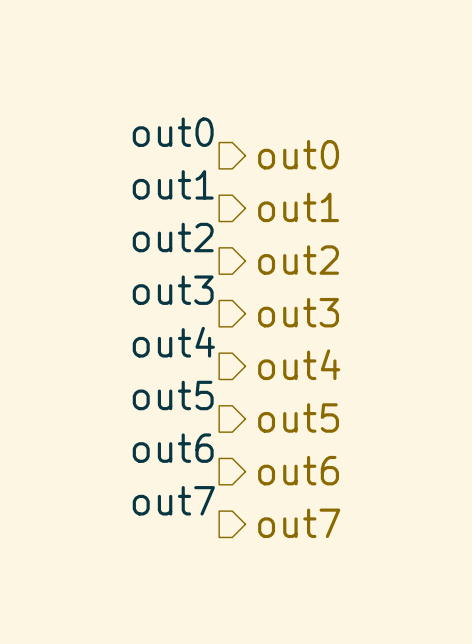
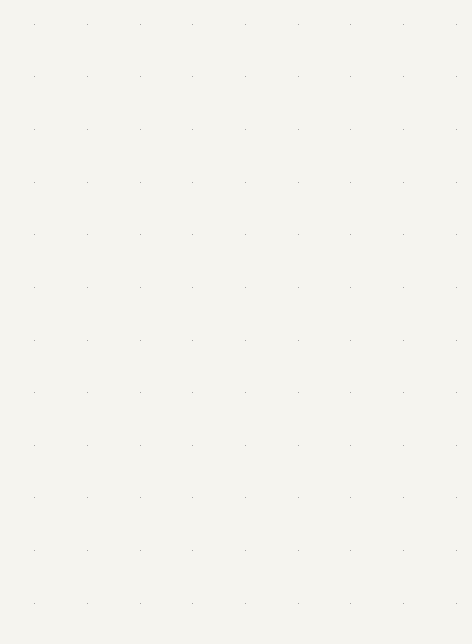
label: out0 (173, 132) -> none
hierarchical label: out0 (298, 154) -> none
label: out1 (173, 184) -> none
hierarchical label: out1 (298, 207) -> none
label: out2 (173, 237) -> none
hierarchical label: out2 (298, 260) -> none
label: out3 (173, 290) -> none
hierarchical label: out3 (298, 312) -> none
label: out4 (173, 342) -> none
hierarchical label: out4 (299, 364) -> none
label: out5 (173, 395) -> none
hierarchical label: out5 (298, 417) -> none
label: out6 (173, 448) -> none
hierarchical label: out6 (298, 470) -> none
label: out7 (173, 500) -> none
hierarchical label: out7 (299, 523) -> none

